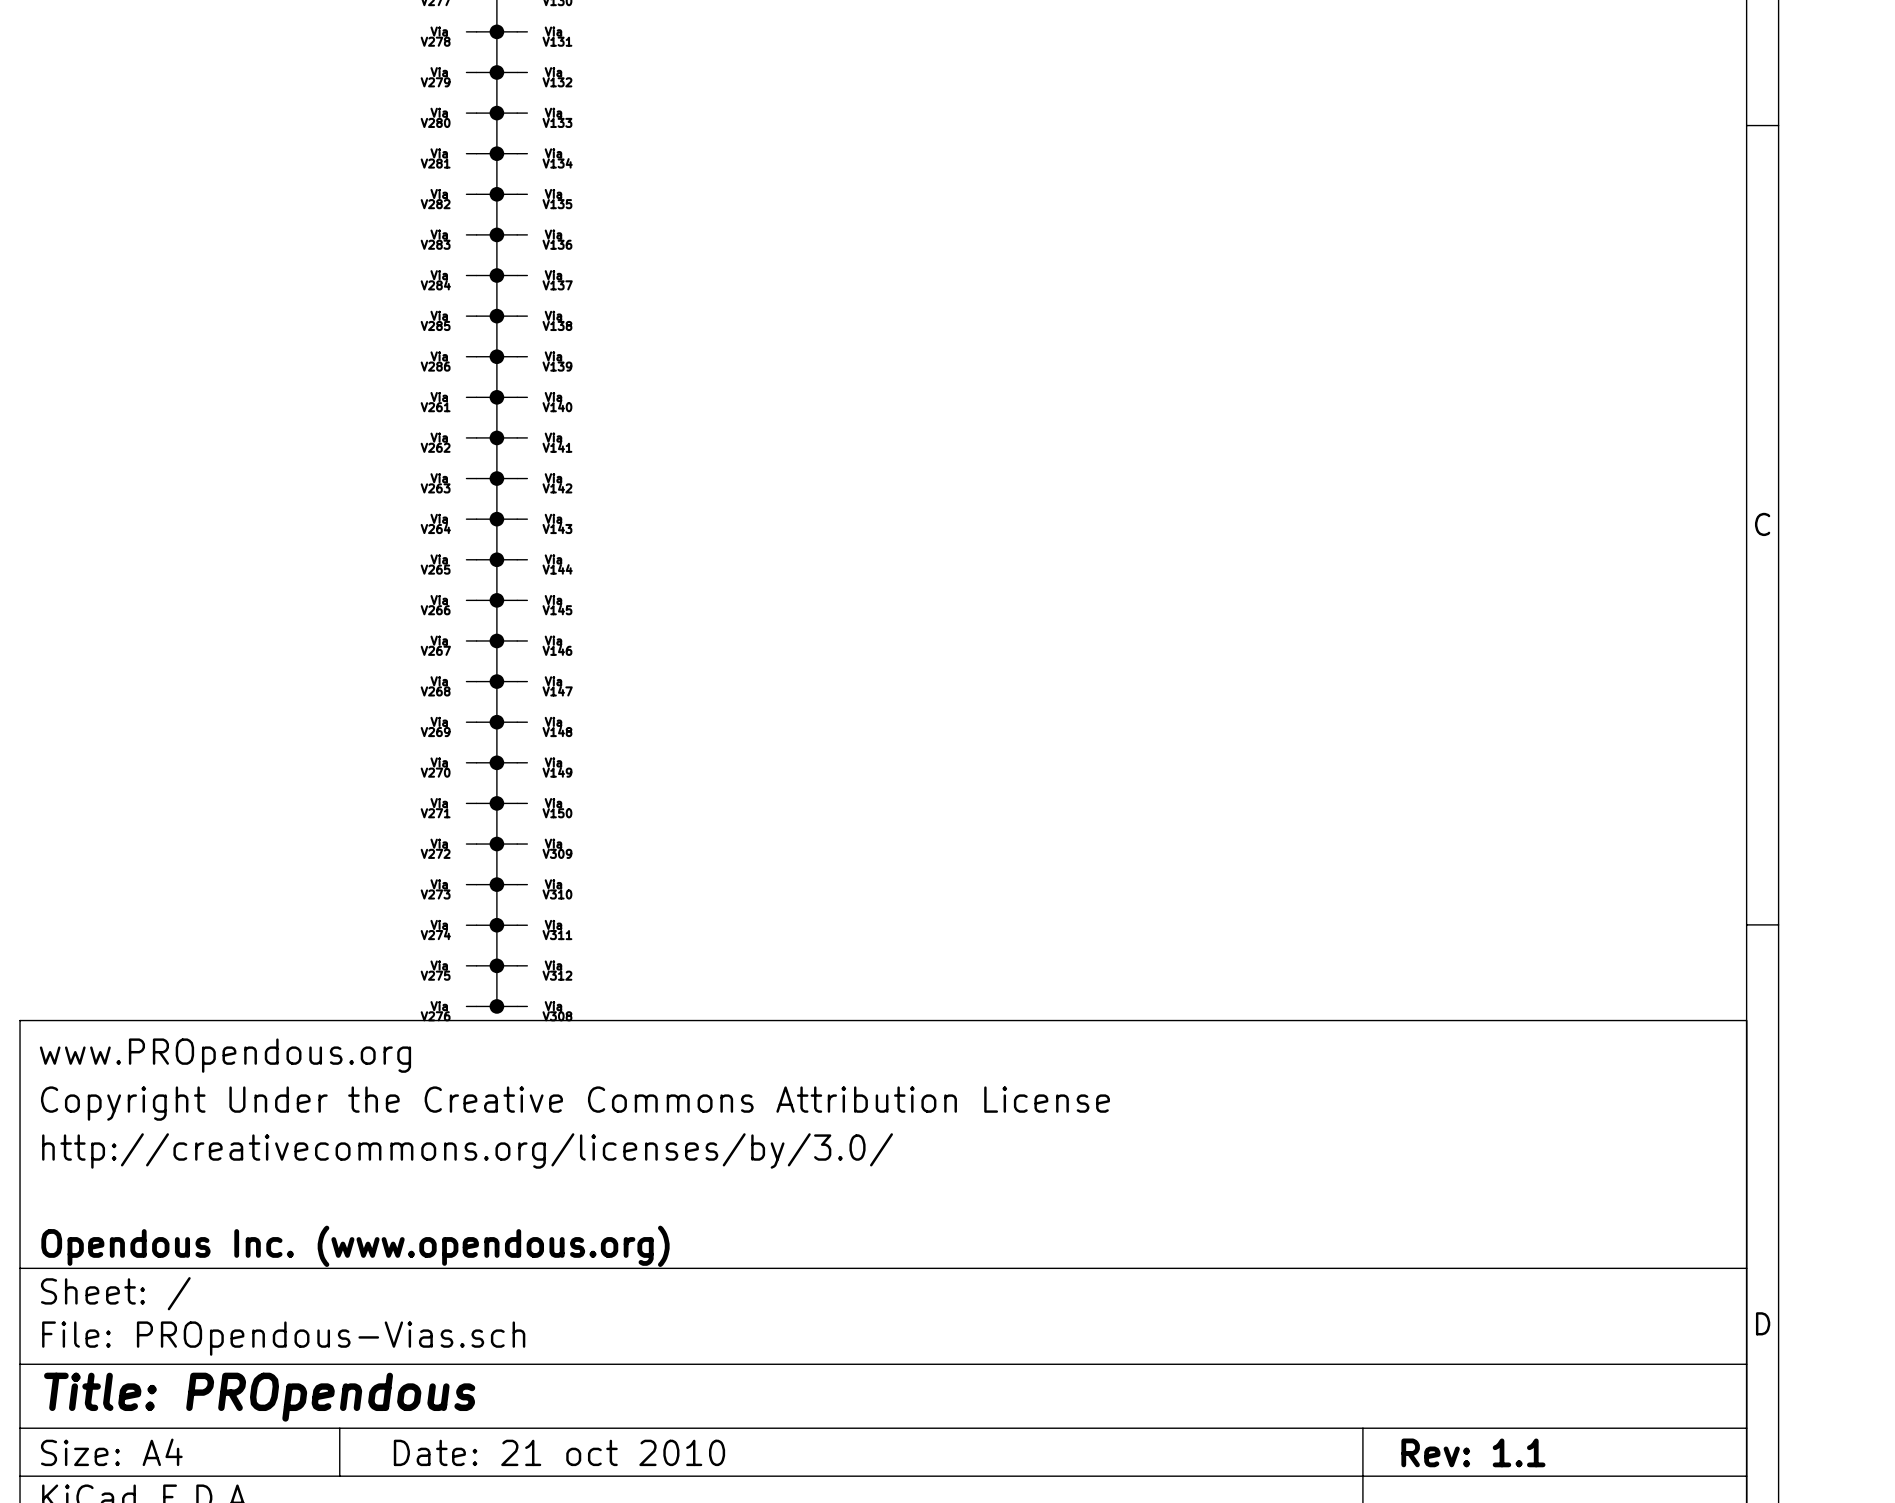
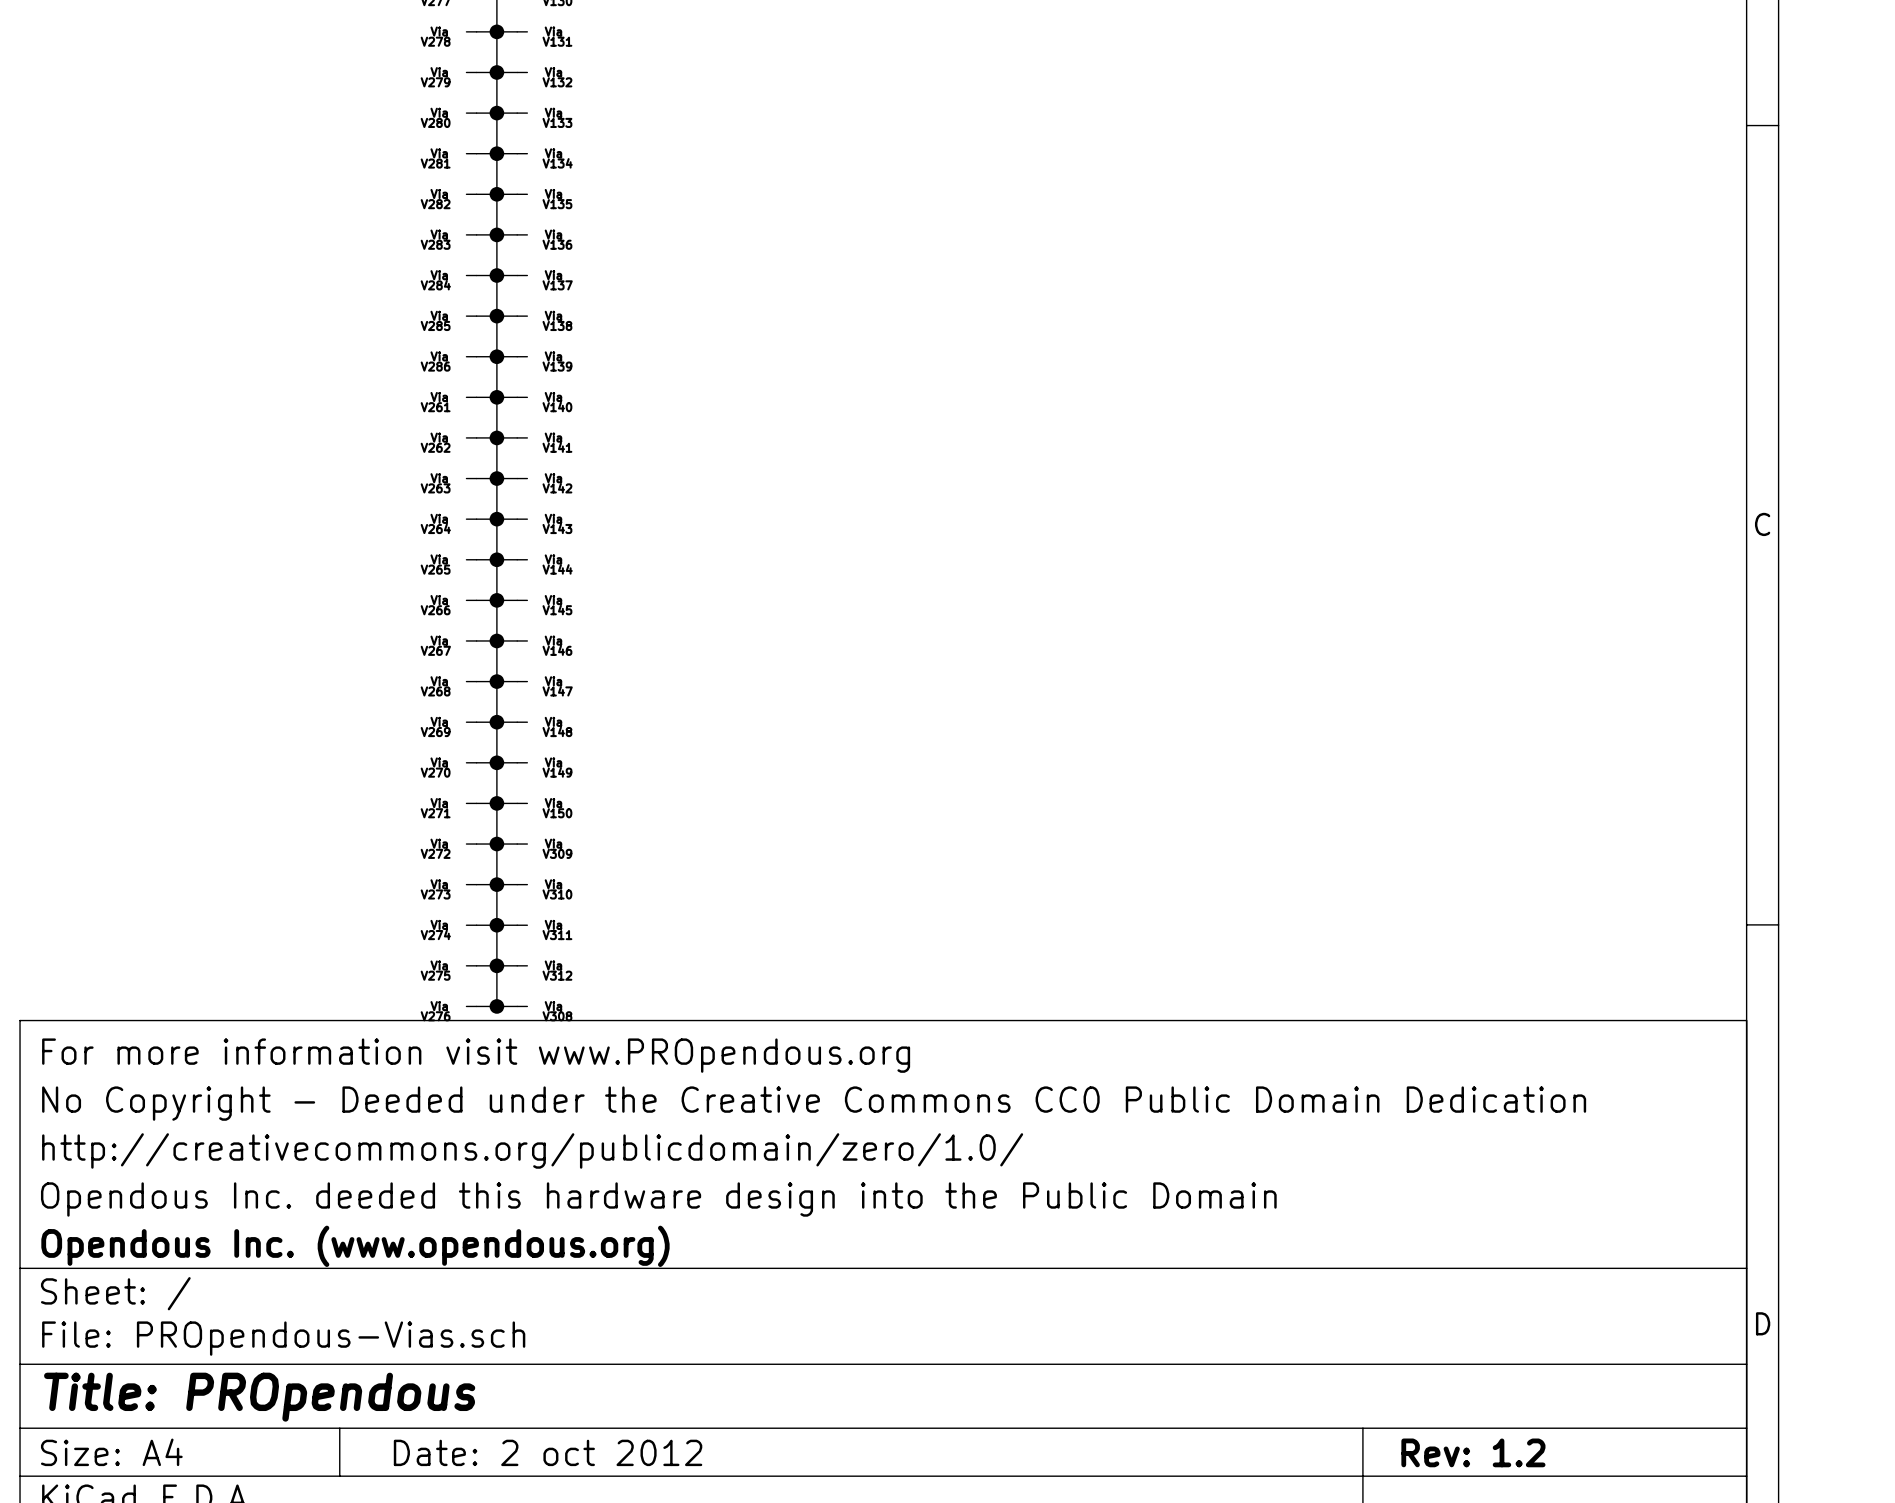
title block: www.PROpendous.org (225, 1055) -> For more information visit www.PROpendous.org (476, 1055)
title block: Copyright Under the Creative Commons Attribution License (575, 1103) -> No Copyright - Deeded under the Creative Commons CC0 Public Domain Dedication (814, 1103)
title block: http://creativecommons.org/licenses/by/3.0/ (467, 1150) -> http://creativecommons.org/publicdomain/zero/1.0/ (532, 1150)
title block: none -> Opendous Inc. deeded this hardware design into the Public Domain (658, 1199)
title block: Date: 21 oct 2010 (559, 1452) -> Date: 2 oct 2012 (548, 1452)
title block: Rev: 1.1 (1473, 1452) -> Rev: 1.2 (1473, 1452)

